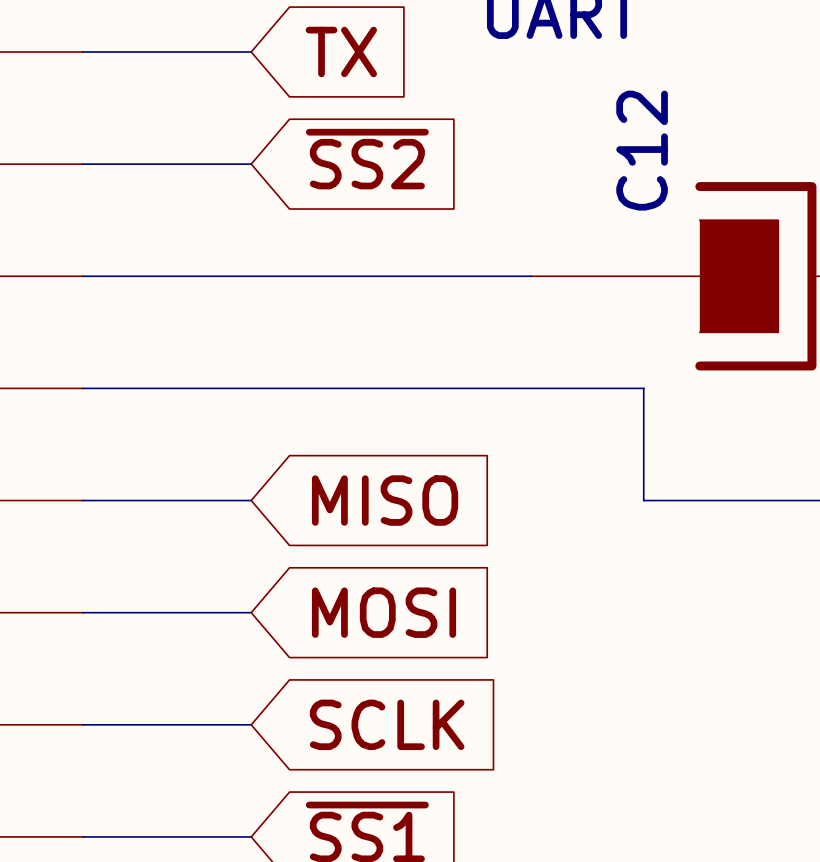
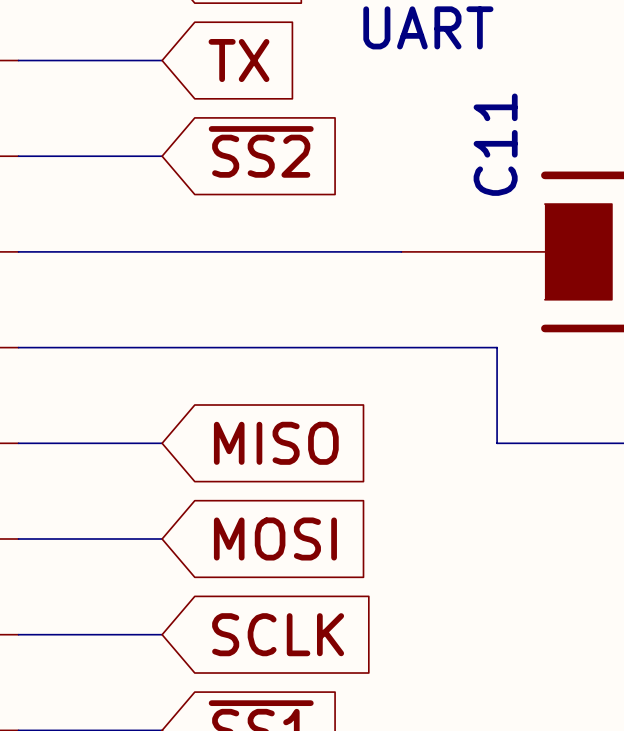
C12 name: C12 (642, 150) -> C11 (495, 144)

